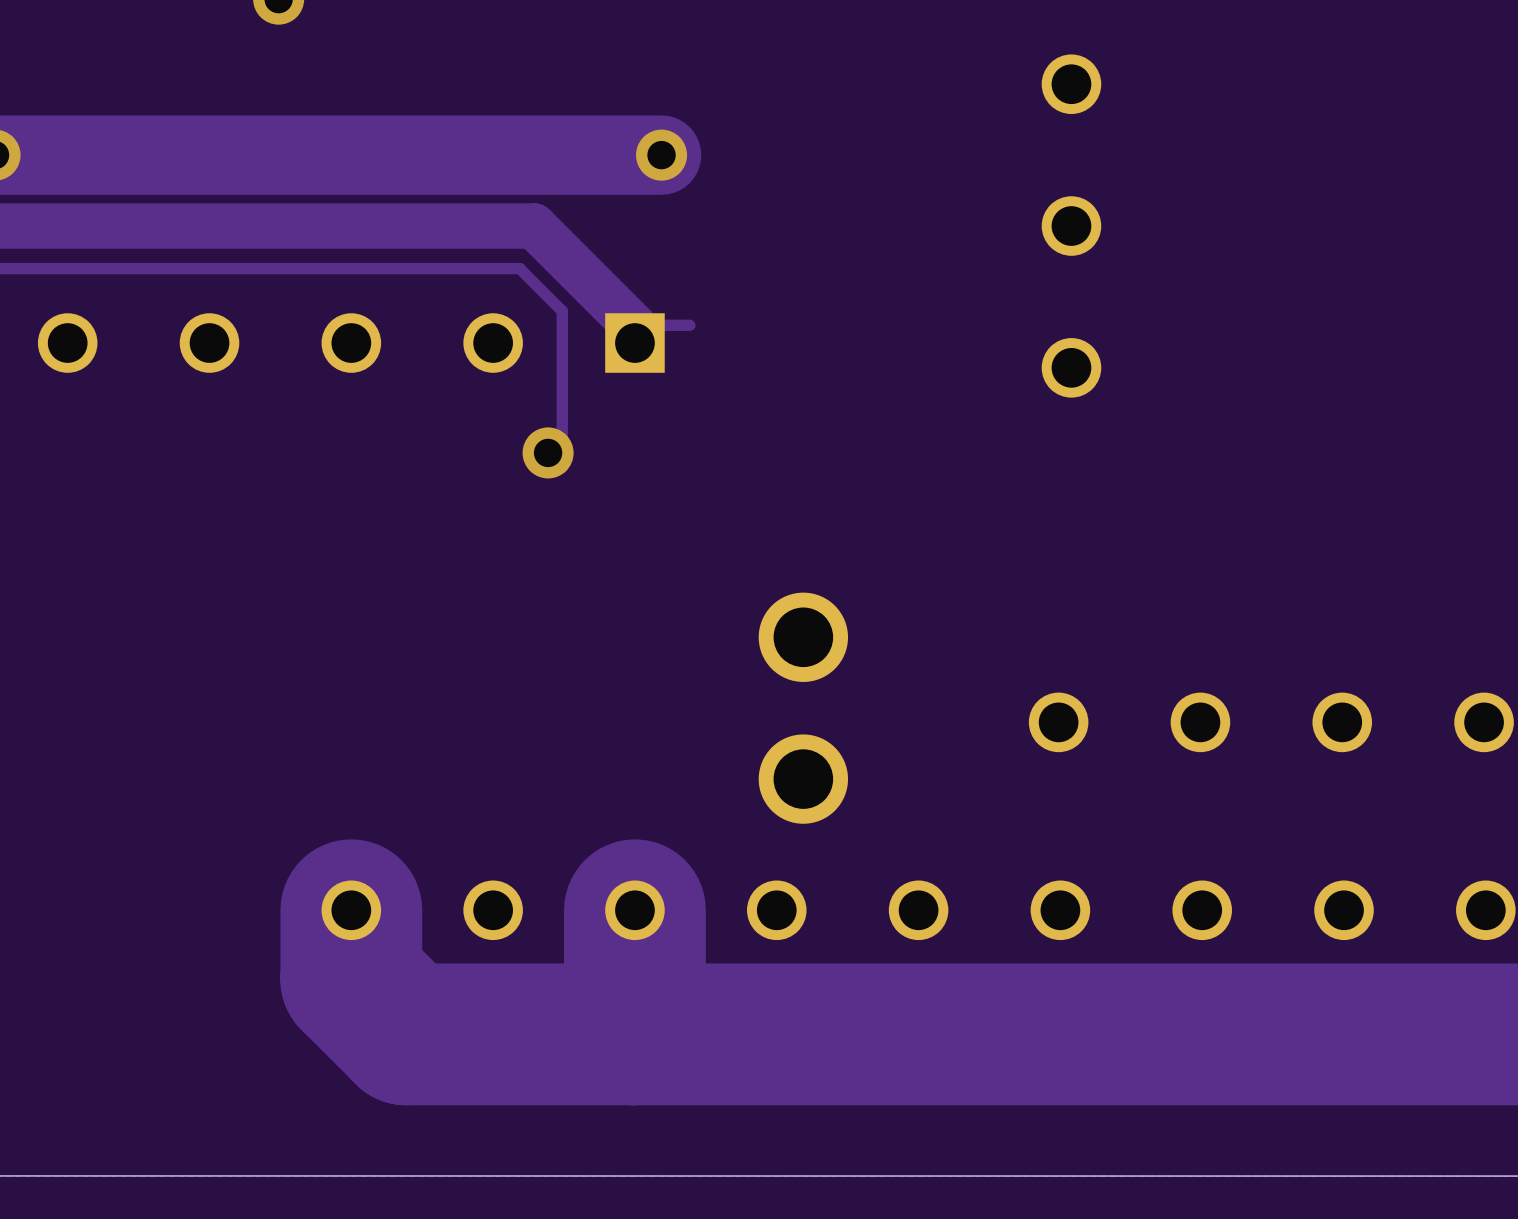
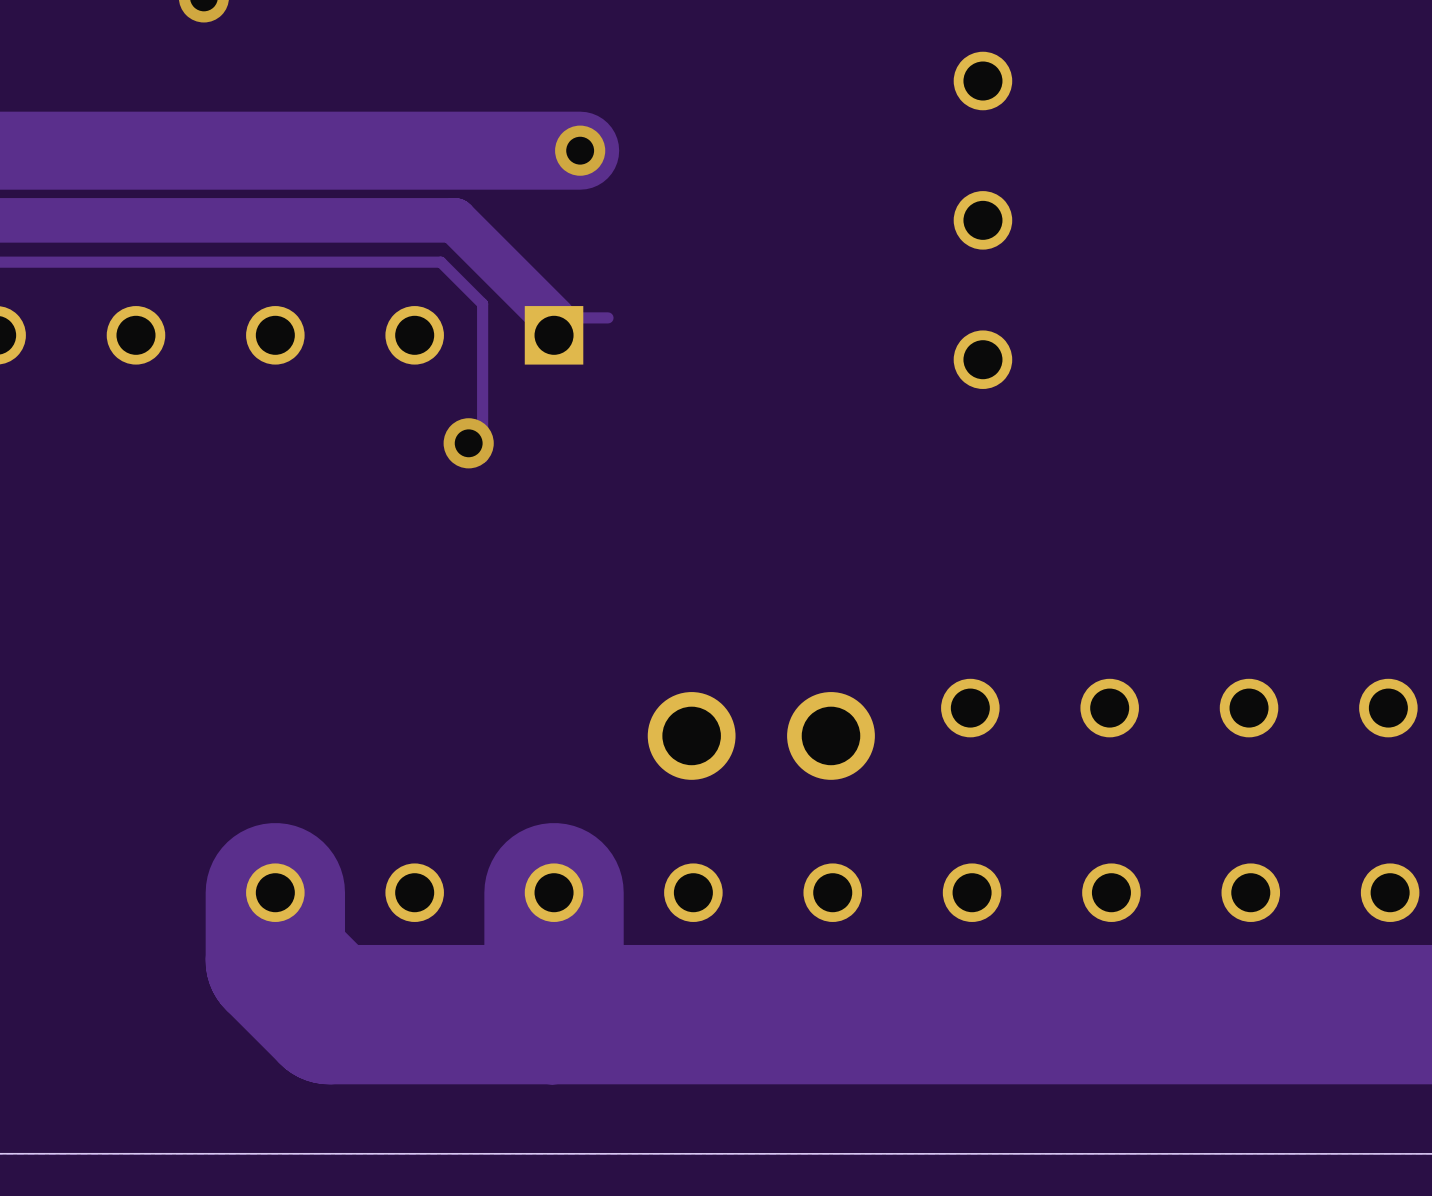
part position: (803, 637) -> (830, 735)
part position: (803, 779) -> (691, 735)

